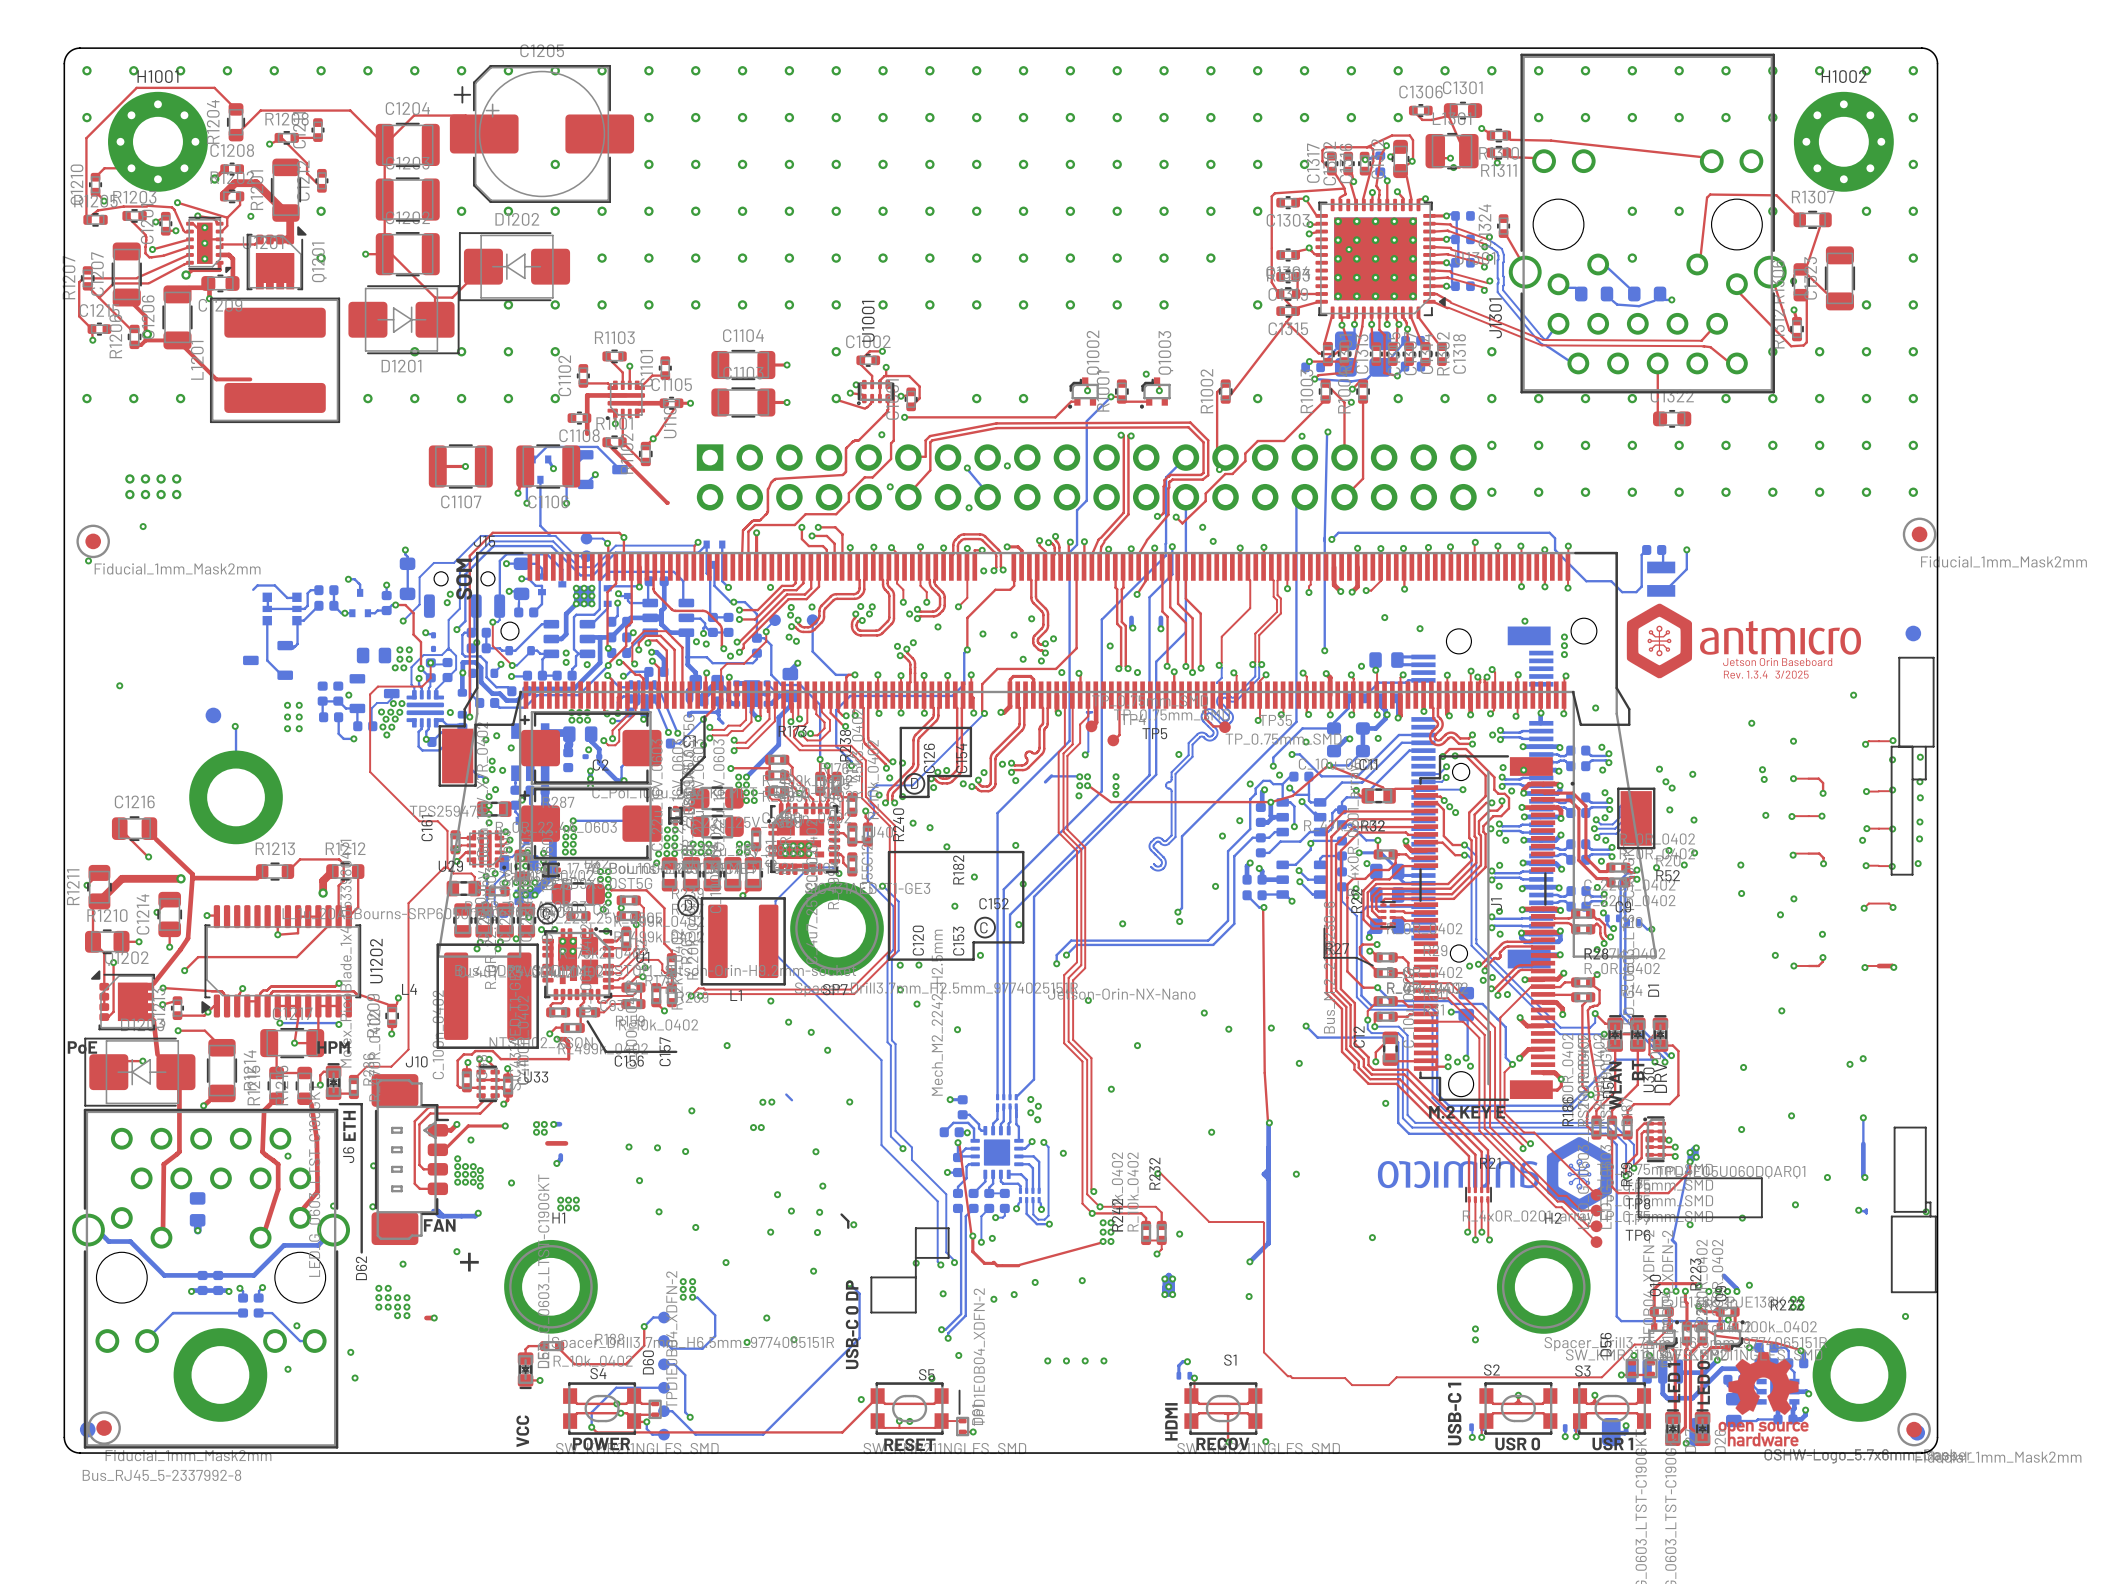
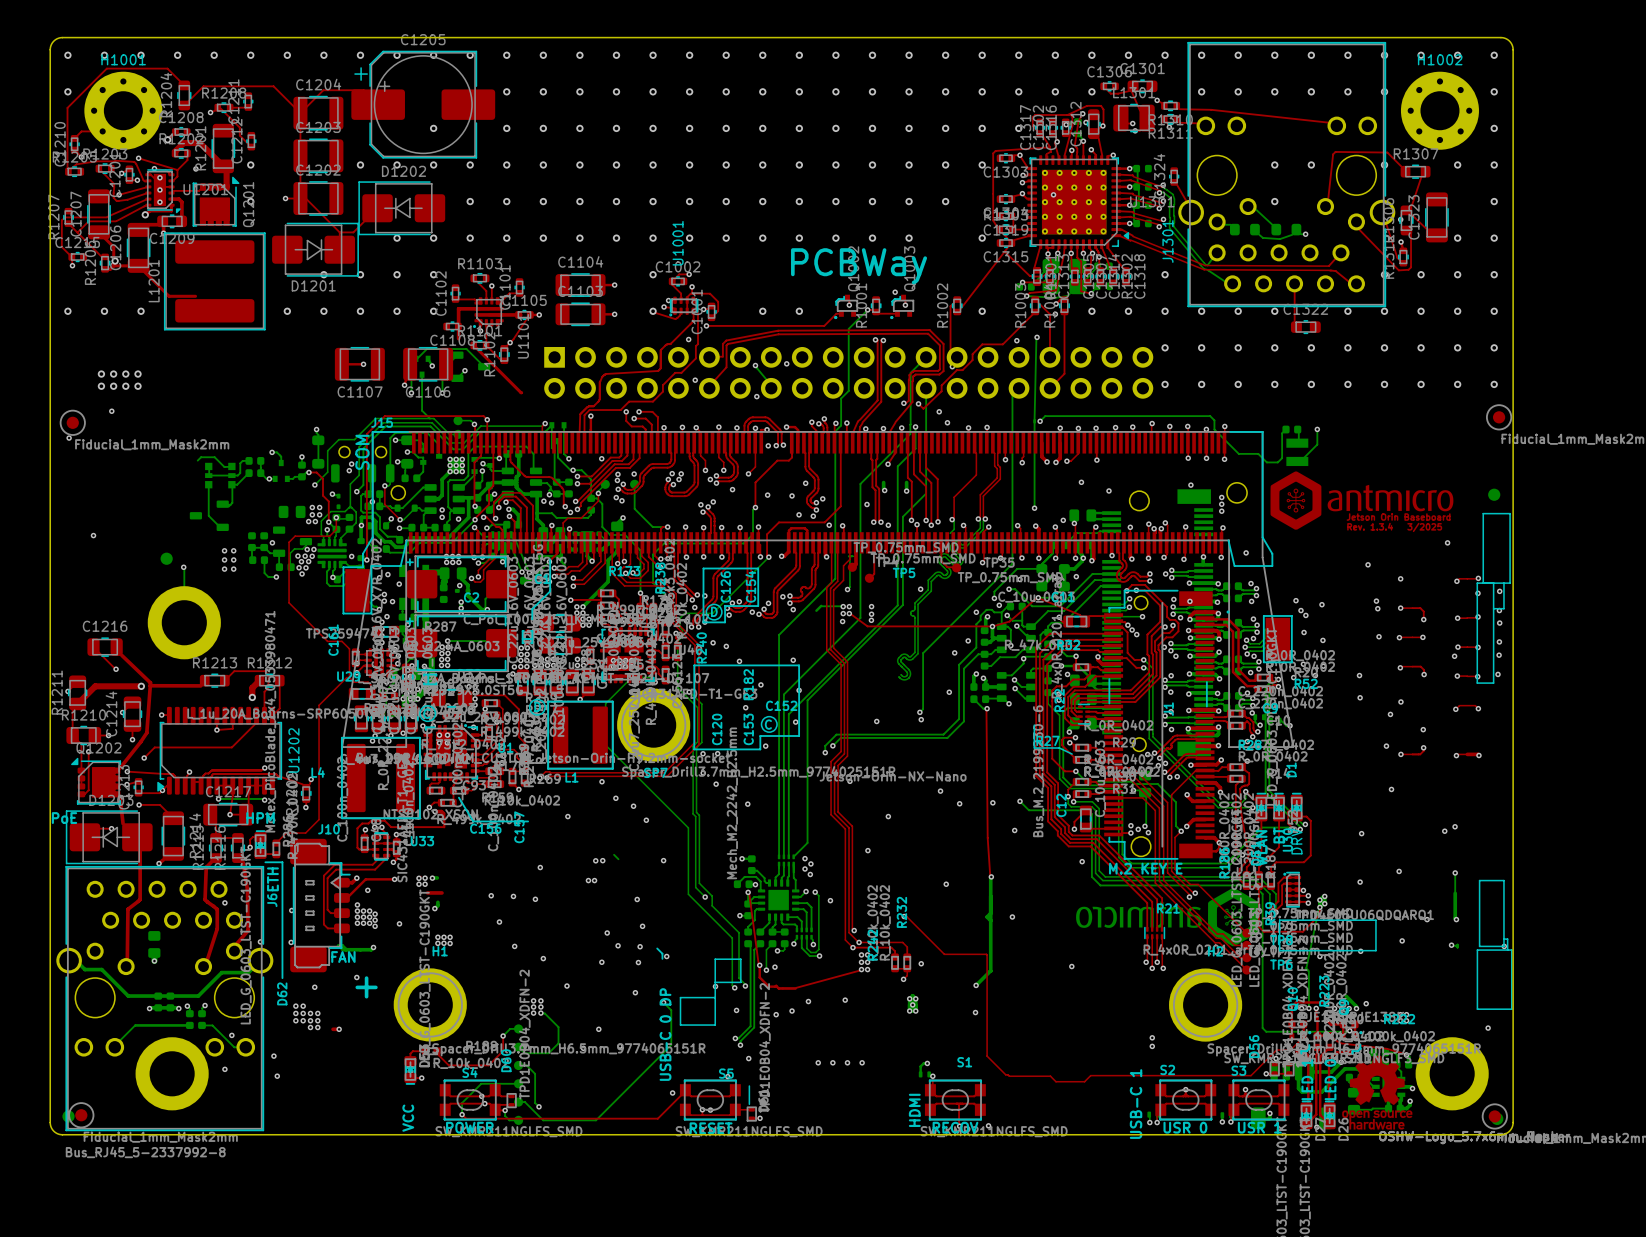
text: none -> PCBWay (859, 266)

